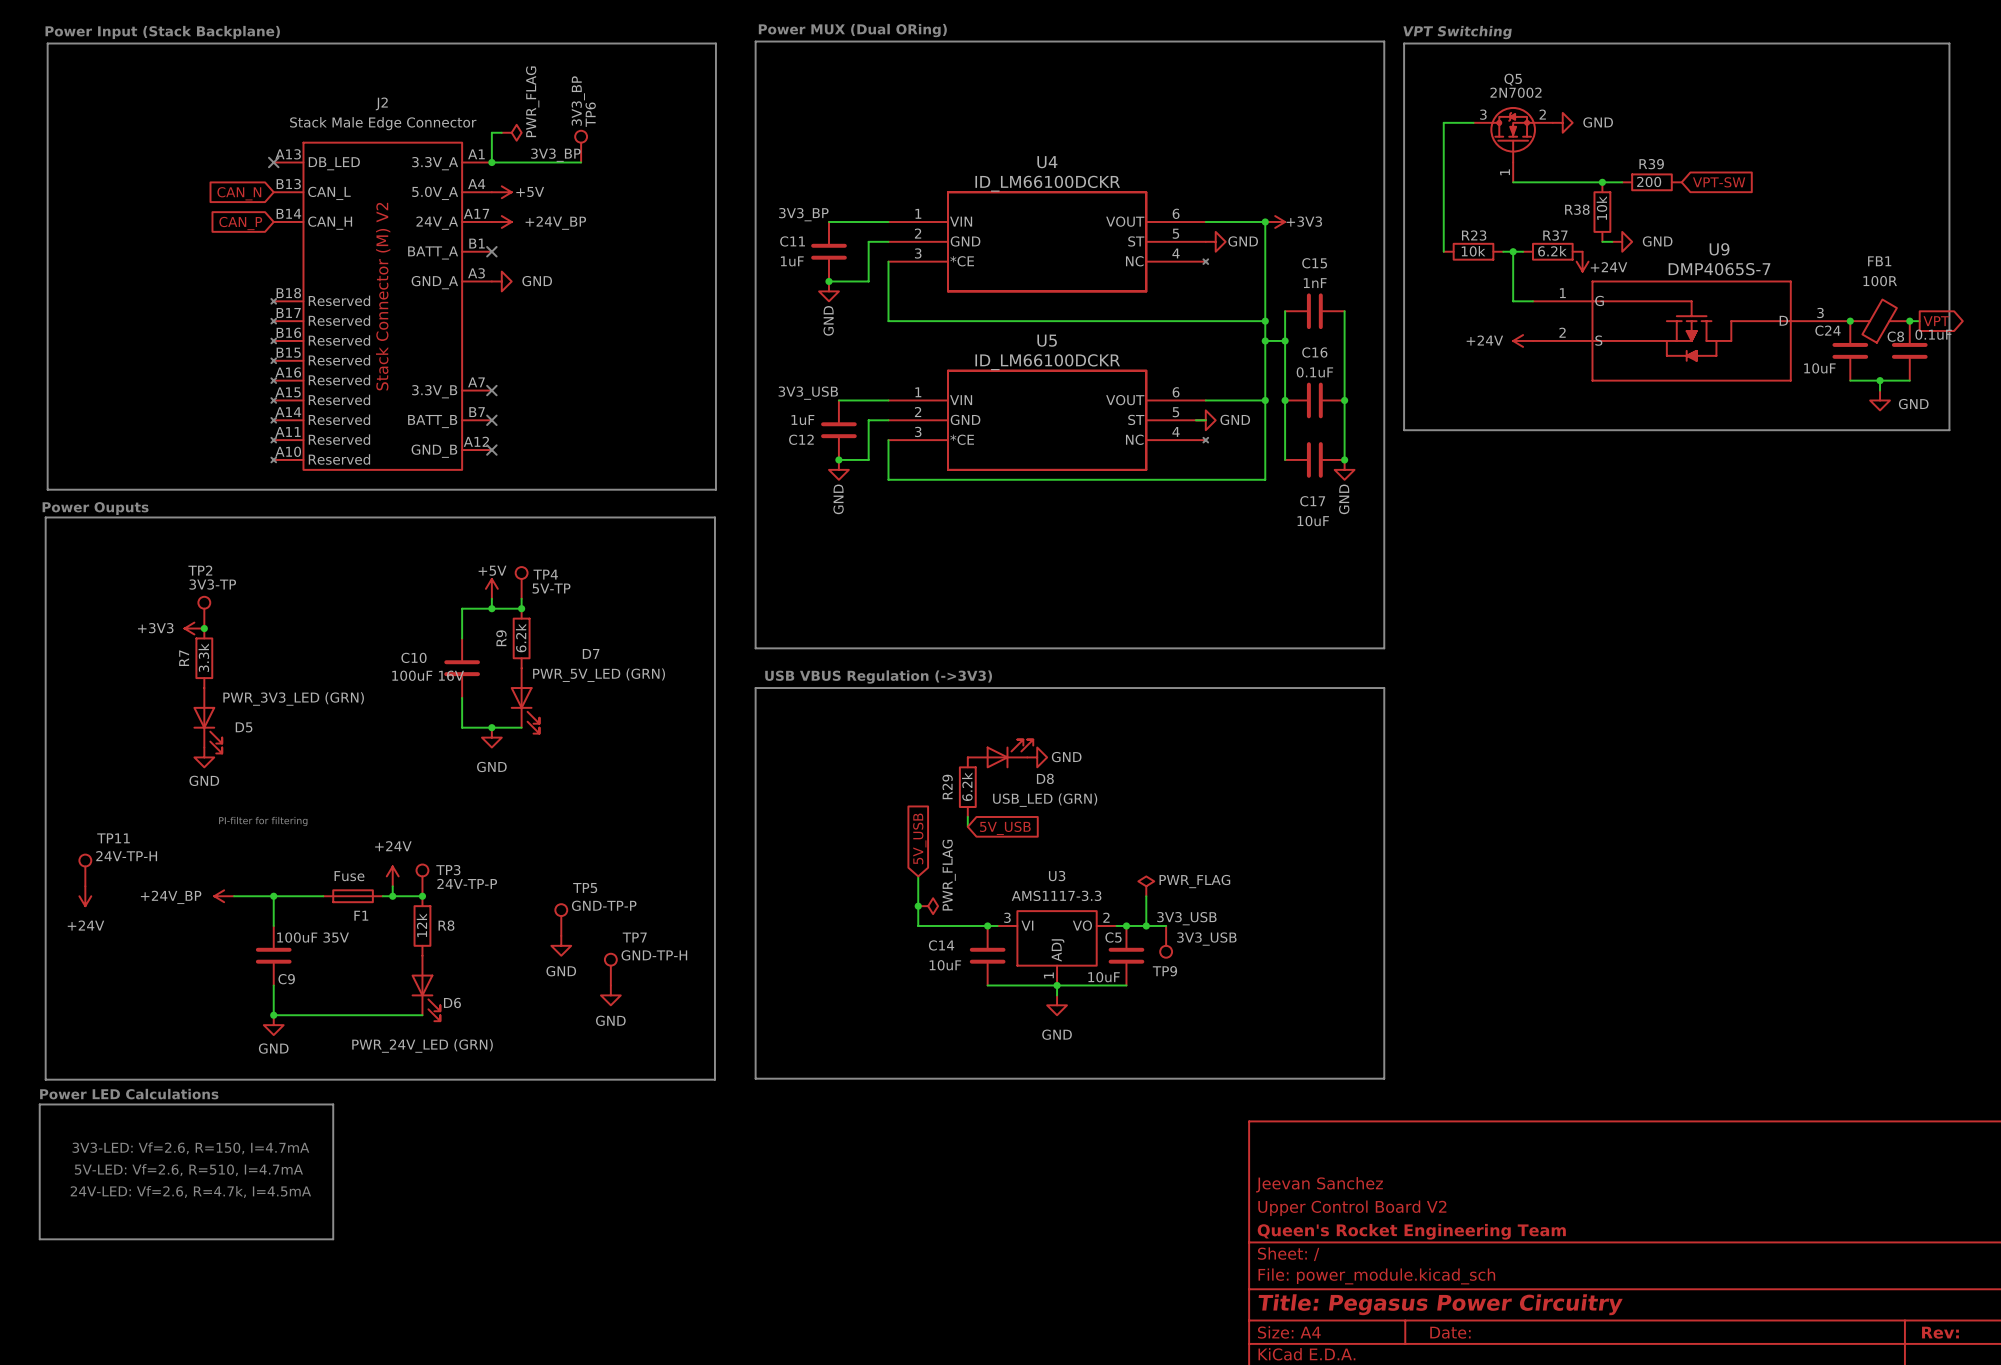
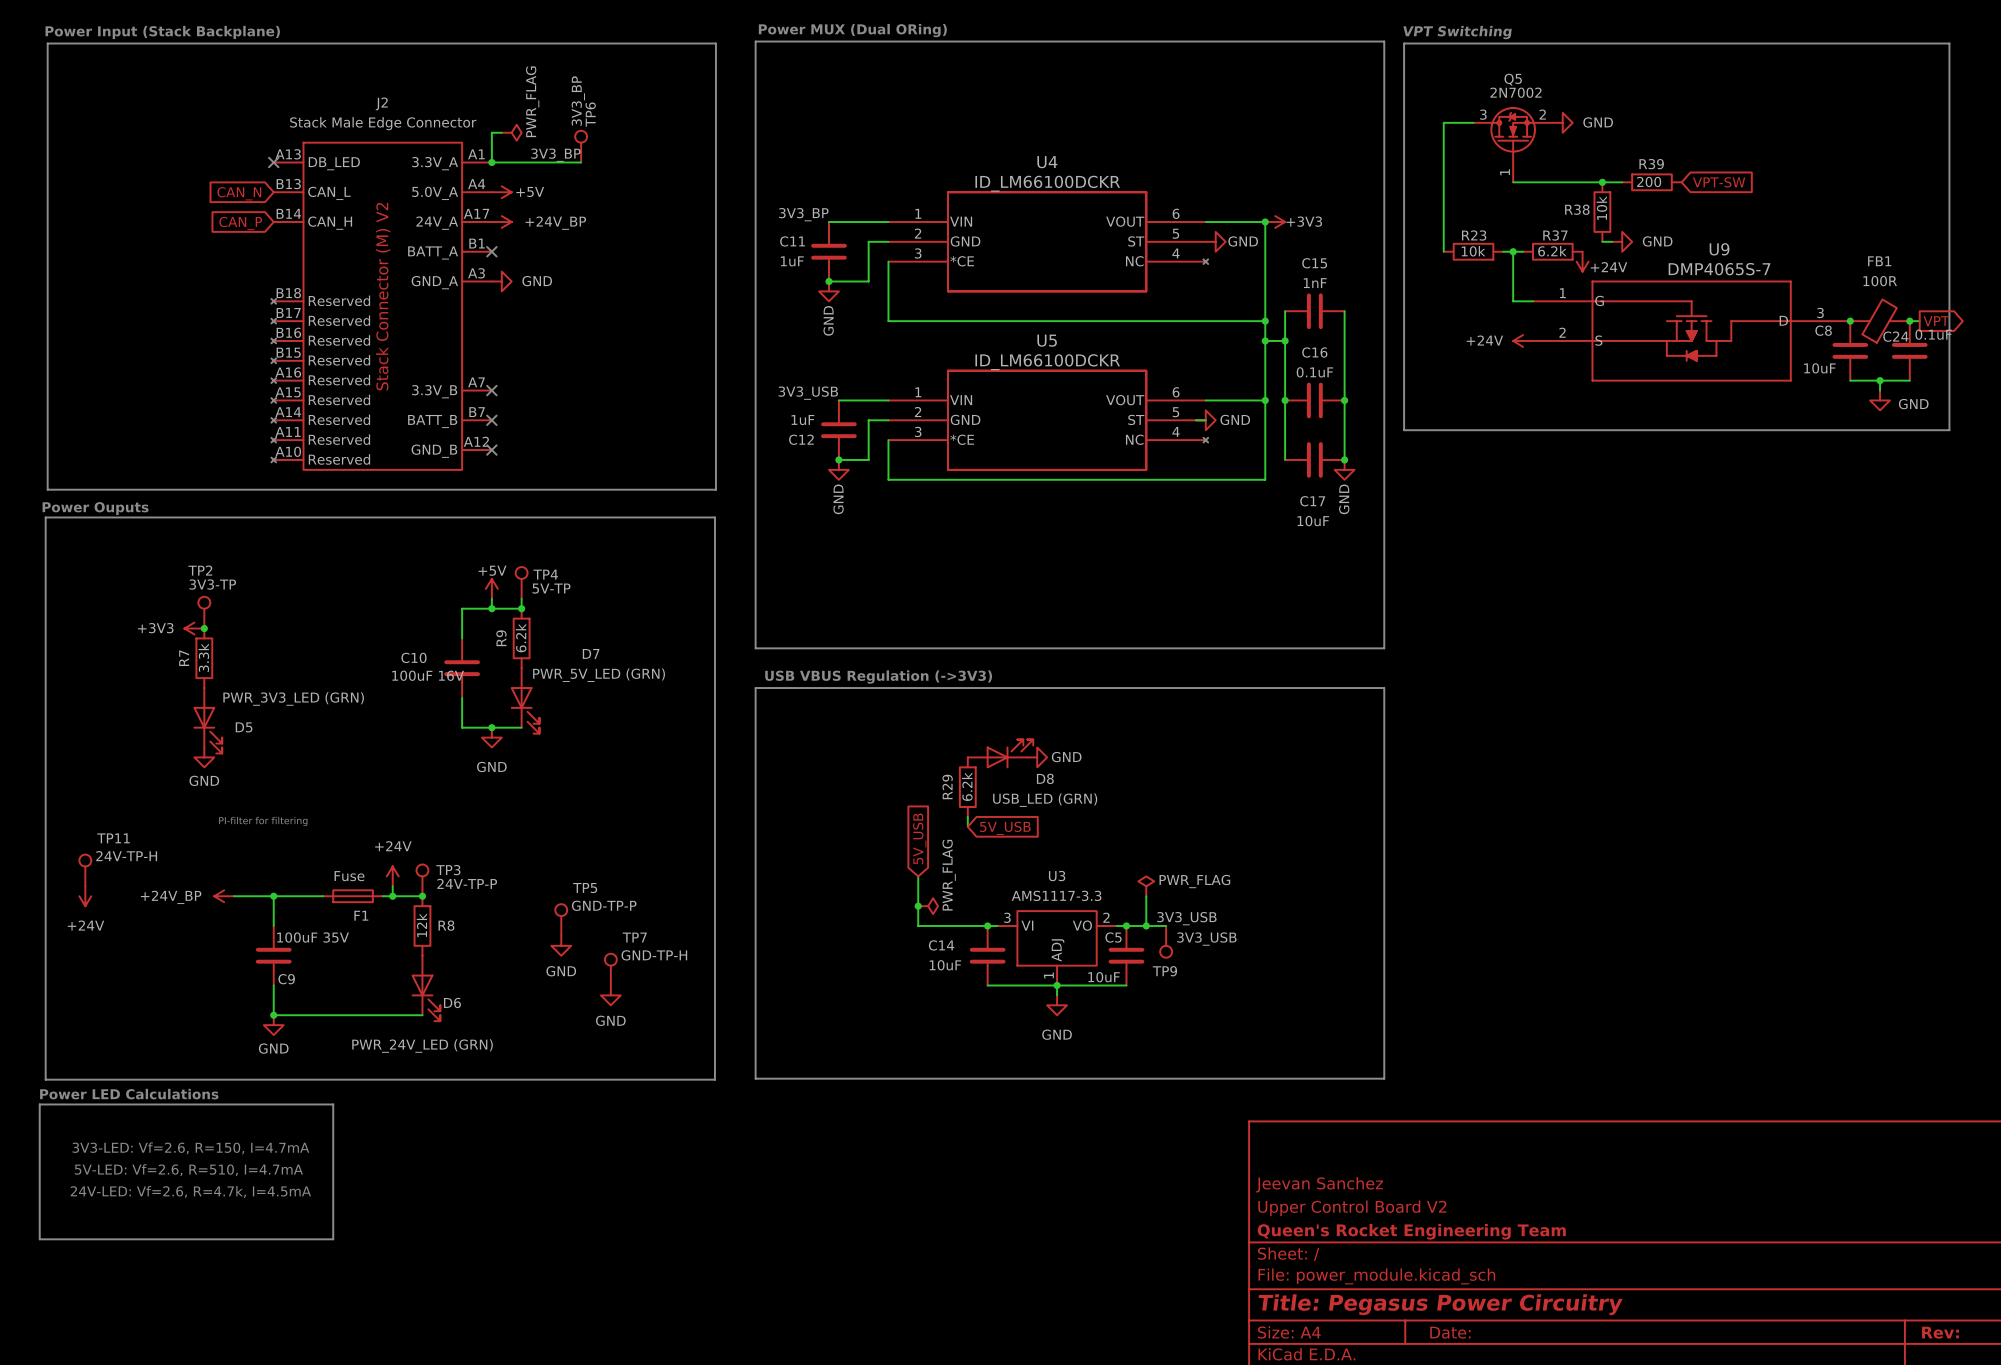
C24 name: C24 (1828, 330) -> C8 (1823, 330)
C8 name: C8 (1895, 336) -> C24 (1895, 336)

